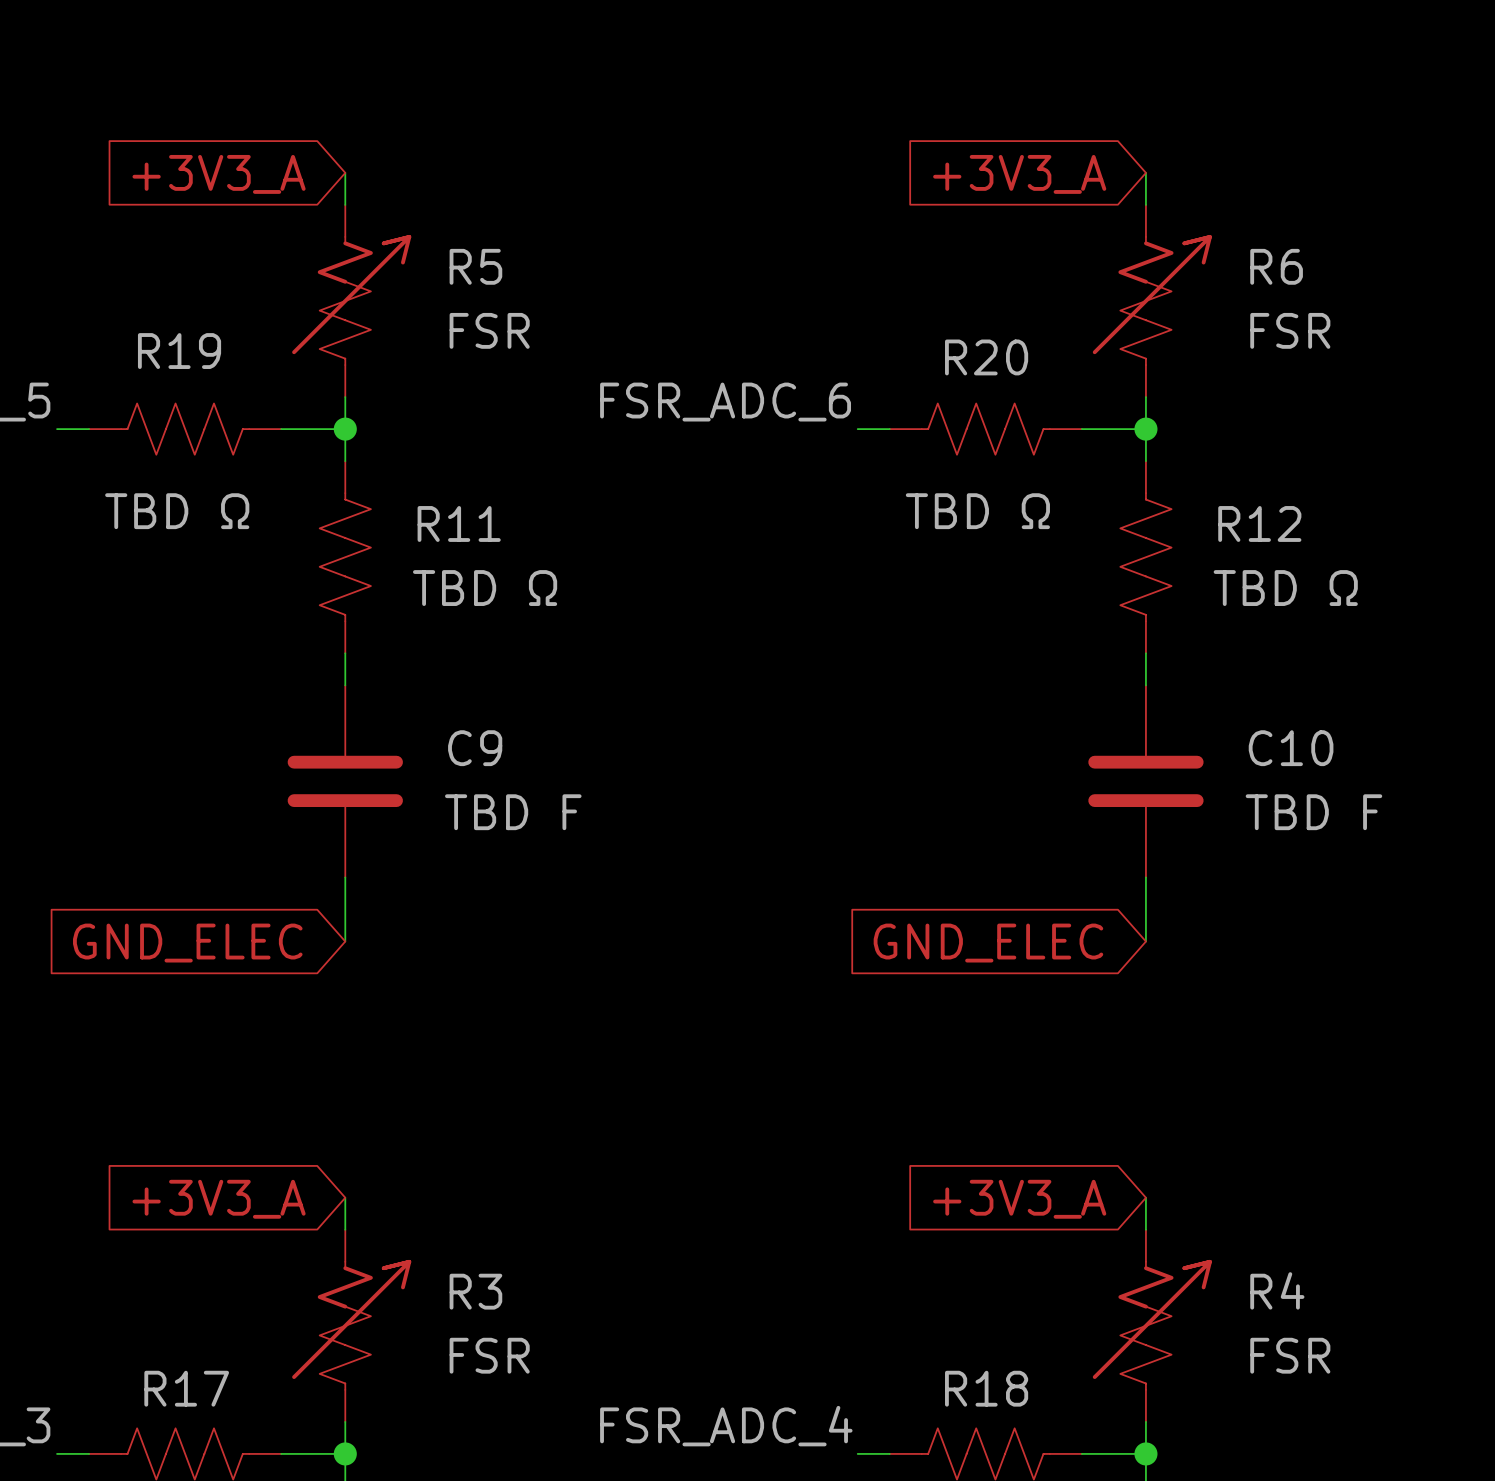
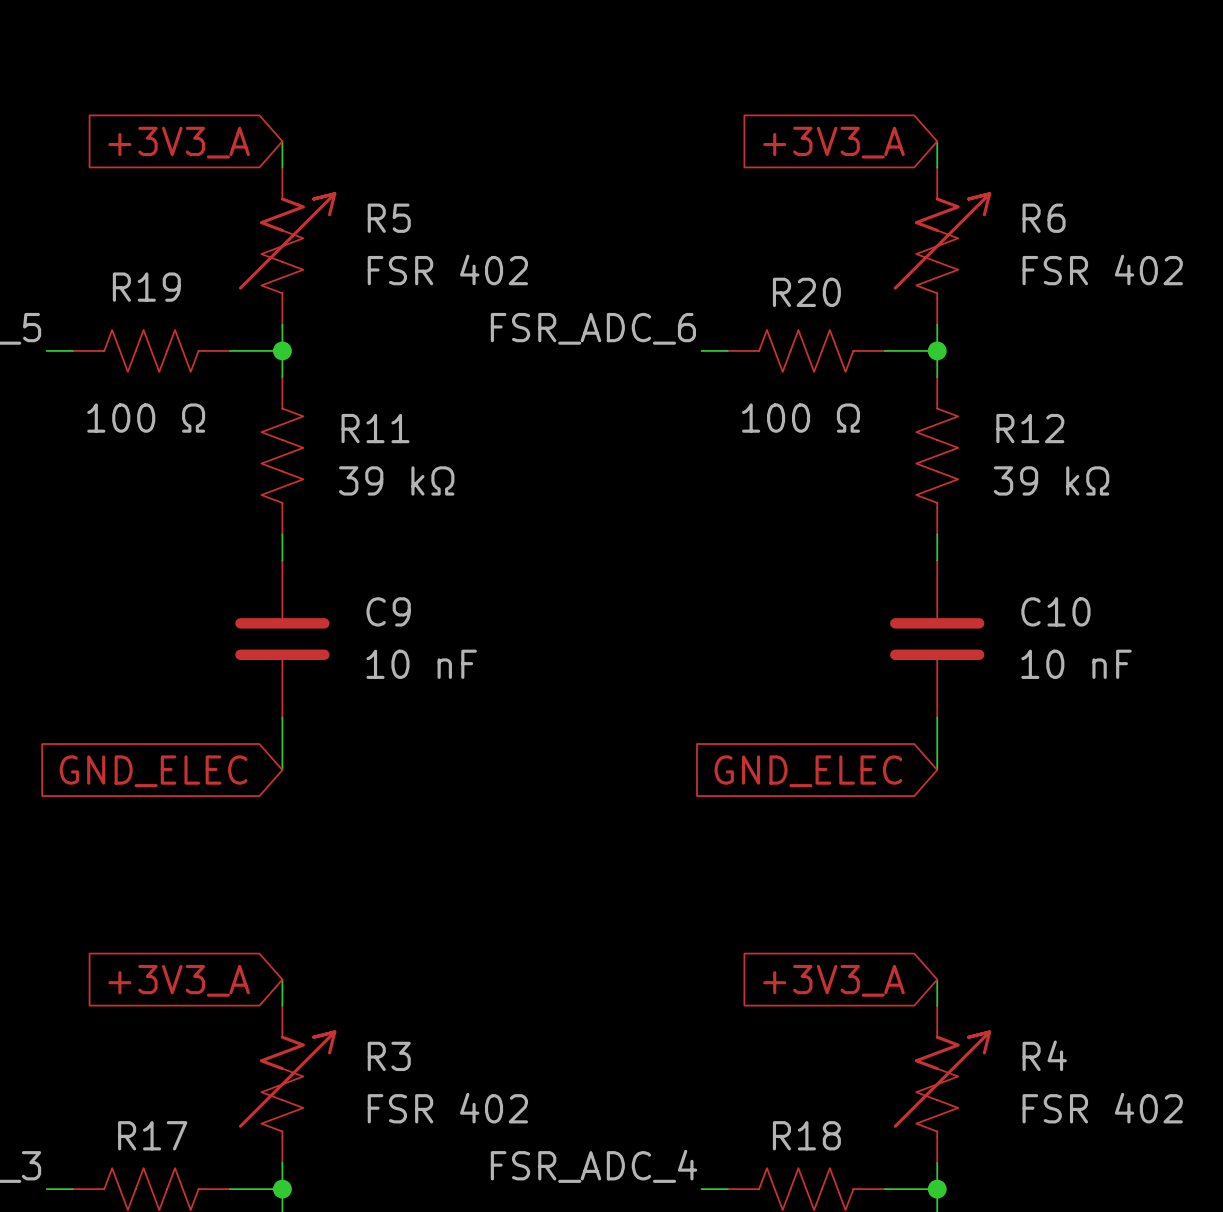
R5 value: FSR (489, 330) -> FSR 402 (447, 269)
R6 value: FSR (1290, 330) -> FSR 402 (1102, 269)
R19 value: TBD Ω (177, 511) -> 100 Ω (146, 418)
R20 value: TBD Ω (977, 511) -> 100 Ω (801, 418)
R11 value: TBD Ω (485, 588) -> 39 kΩ (396, 480)
R12 value: TBD Ω (1285, 588) -> 39 kΩ (1051, 480)
C9 value: TBD F (513, 812) -> 10 nF (421, 664)
C10 value: TBD F (1313, 812) -> 10 nF (1076, 664)
R3 value: FSR (489, 1355) -> FSR 402 (447, 1108)
R4 value: FSR (1290, 1355) -> FSR 402 (1102, 1108)

